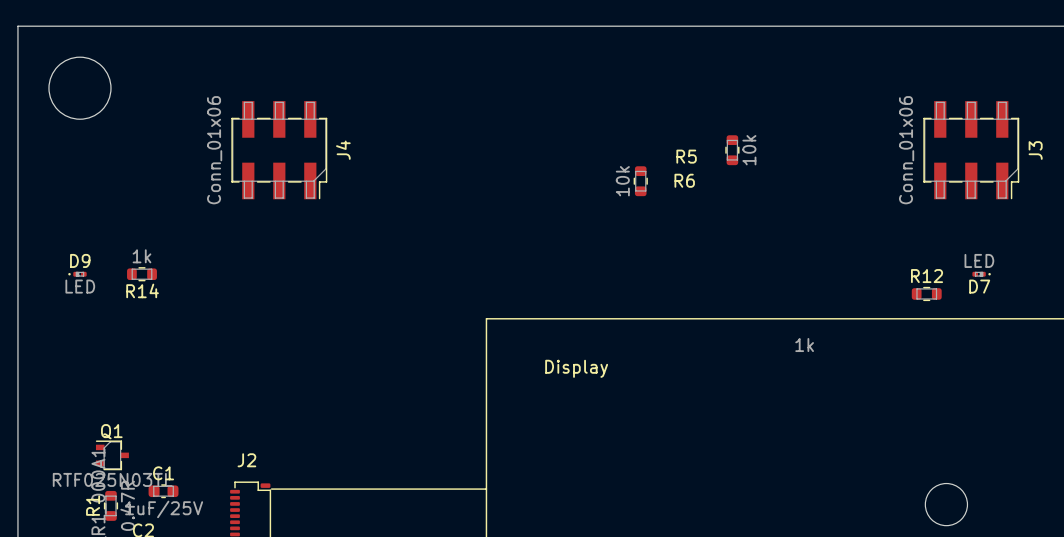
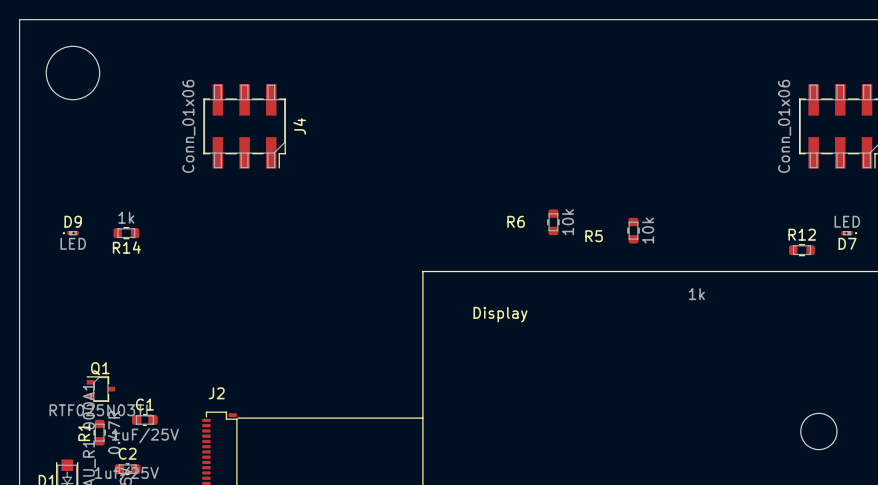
R5 position: (732, 150) -> (633, 230)
R6 name position: R6 (684, 180) -> R6 (516, 221)
R6 value position: 10k (622, 181) -> 10k (568, 222)
R6 position: (640, 181) -> (553, 222)

